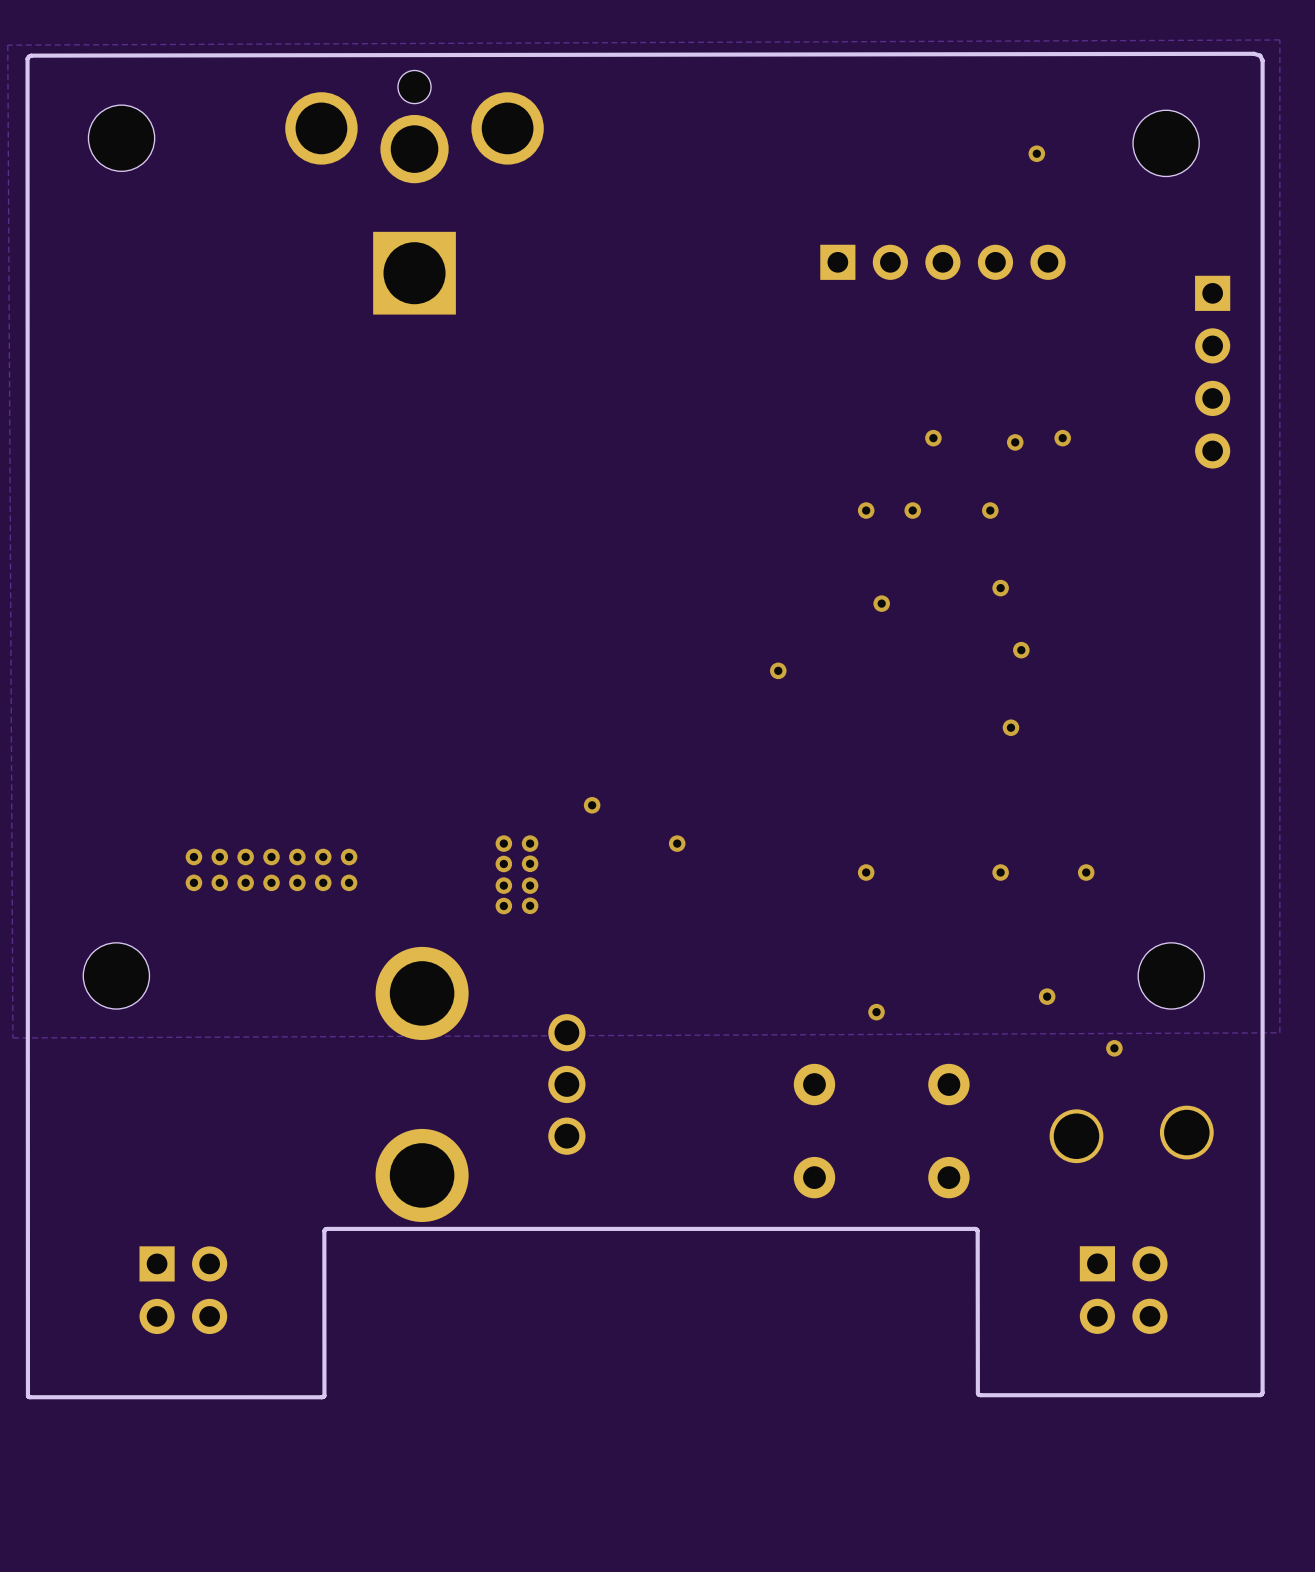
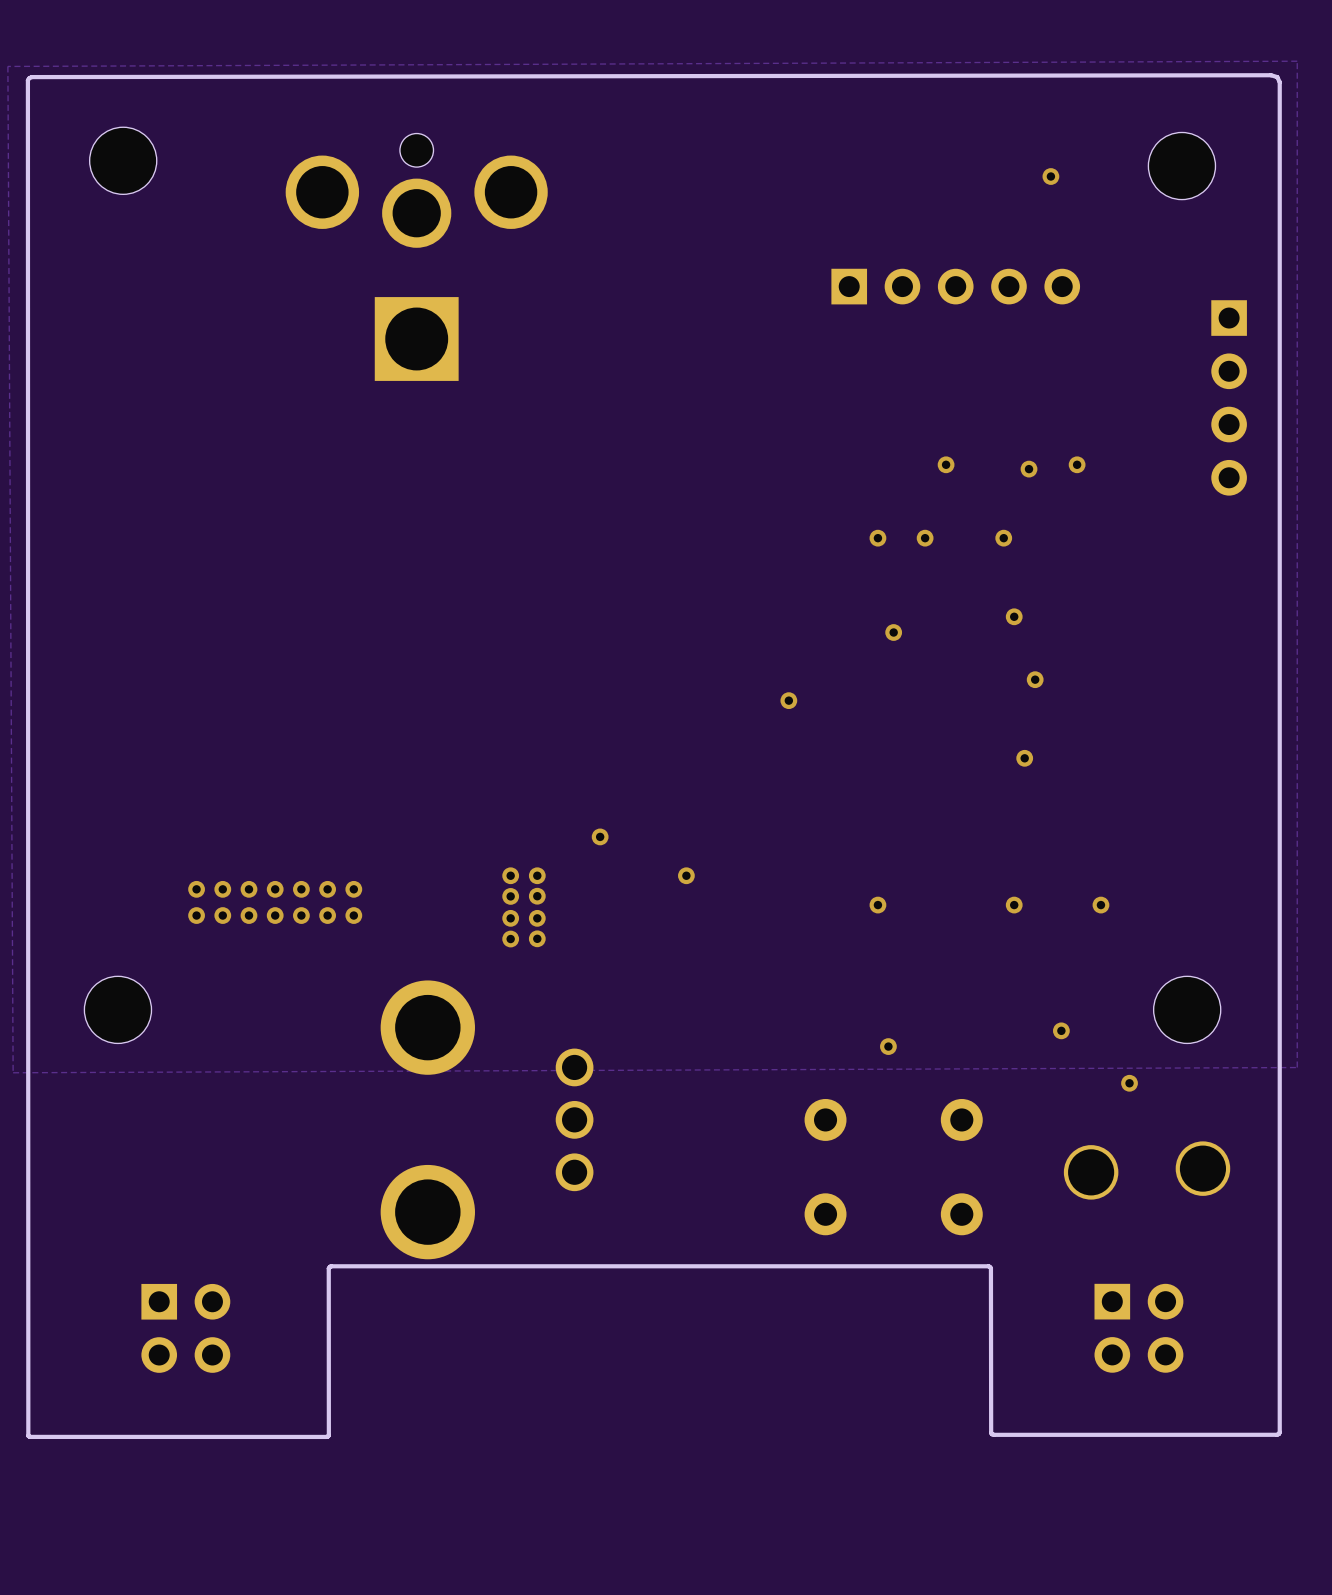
part position: (414, 192) -> (416, 257)

